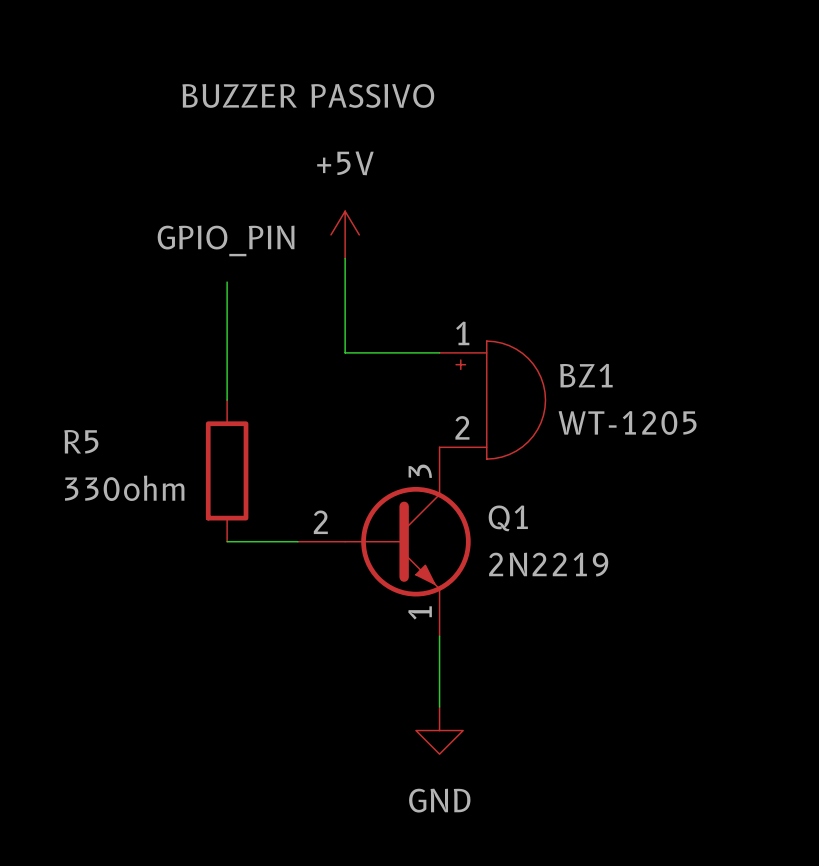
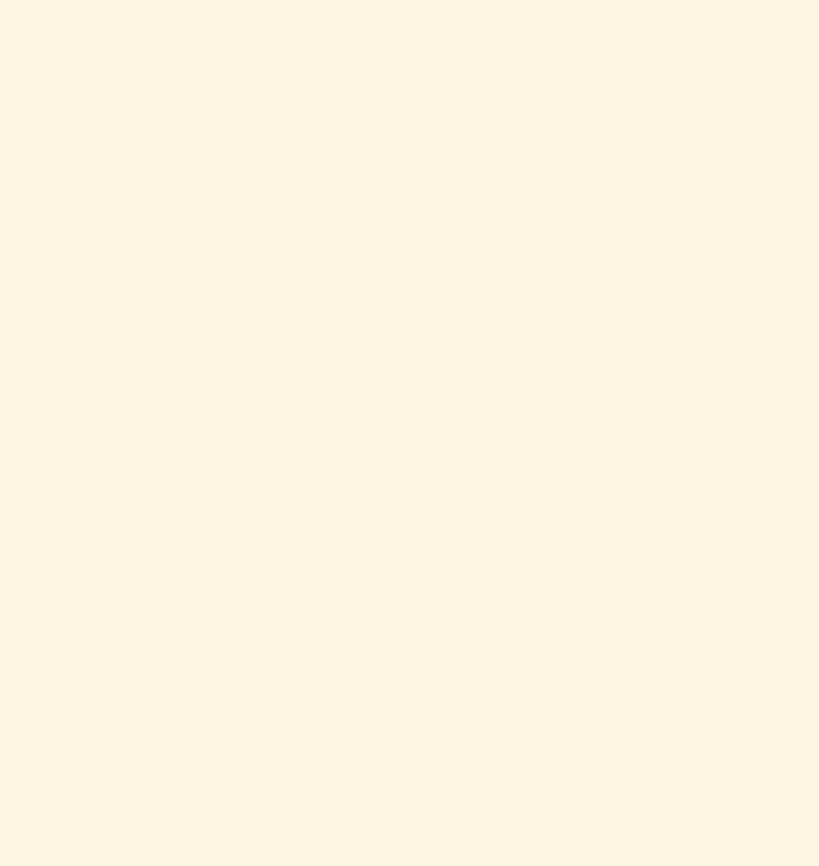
label: BUZZER PASSIVO (308, 95) -> none
power symbol: +5V (345, 234) -> none
label: GPIO_PIN (226, 240) -> none
wire: (345, 258) (345, 352) (439, 352) -> none
wire: (227, 282) (227, 400) -> none
BZ1: WT-1205 (492, 400) -> none
R5: 330ohm (227, 470) -> none
wire: (227, 541) (297, 541) -> none
Q1: 2N2219 (384, 541) -> none
wire: (439, 636) (439, 706) -> none
power symbol: GND (439, 730) -> none

